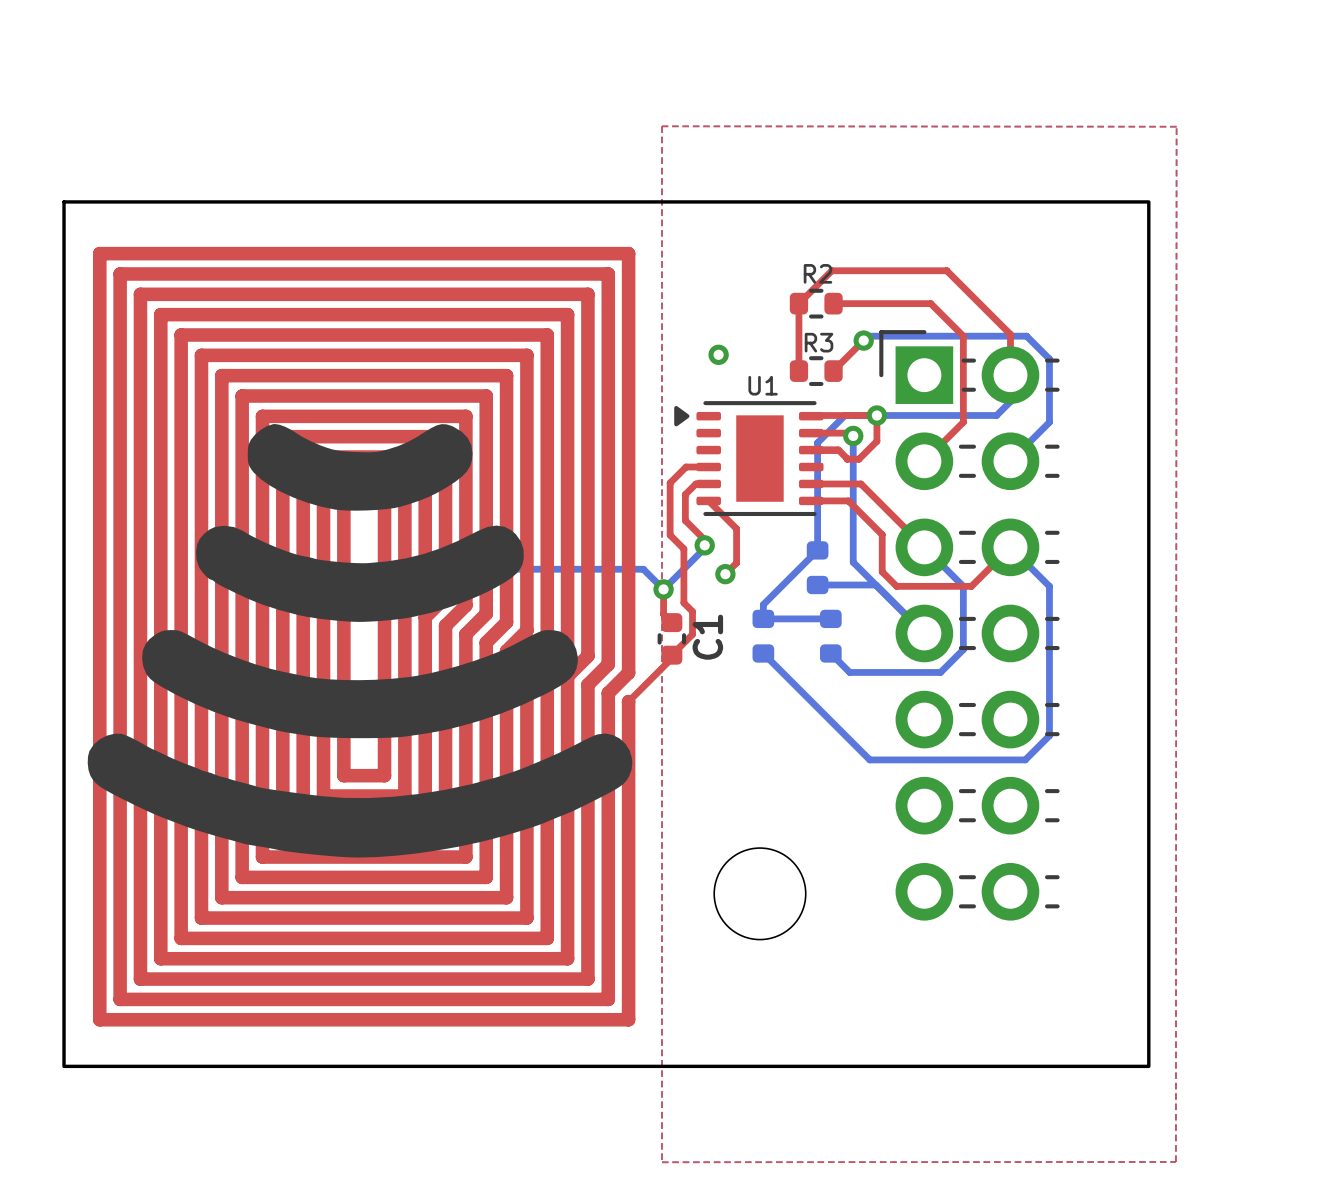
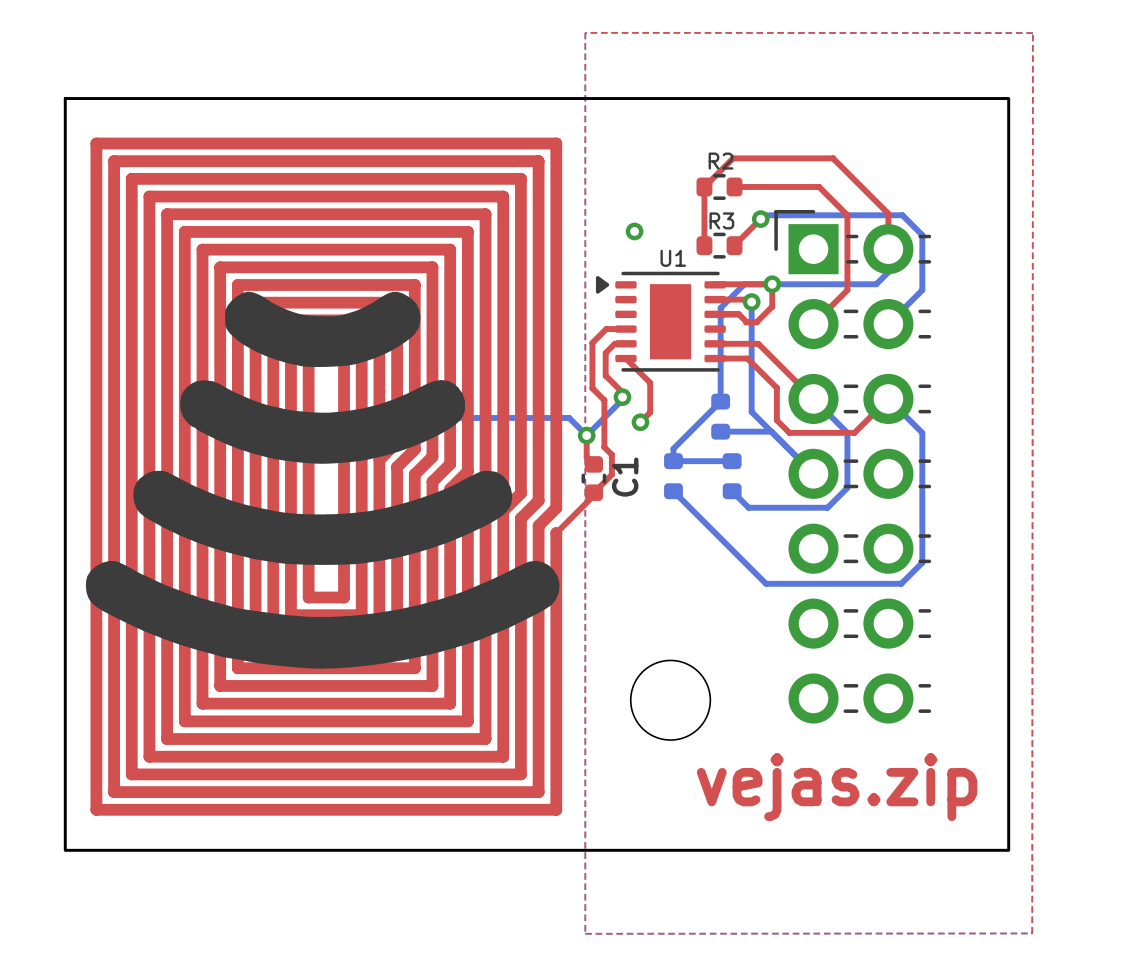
text: none -> vejas.zip (837, 787)

